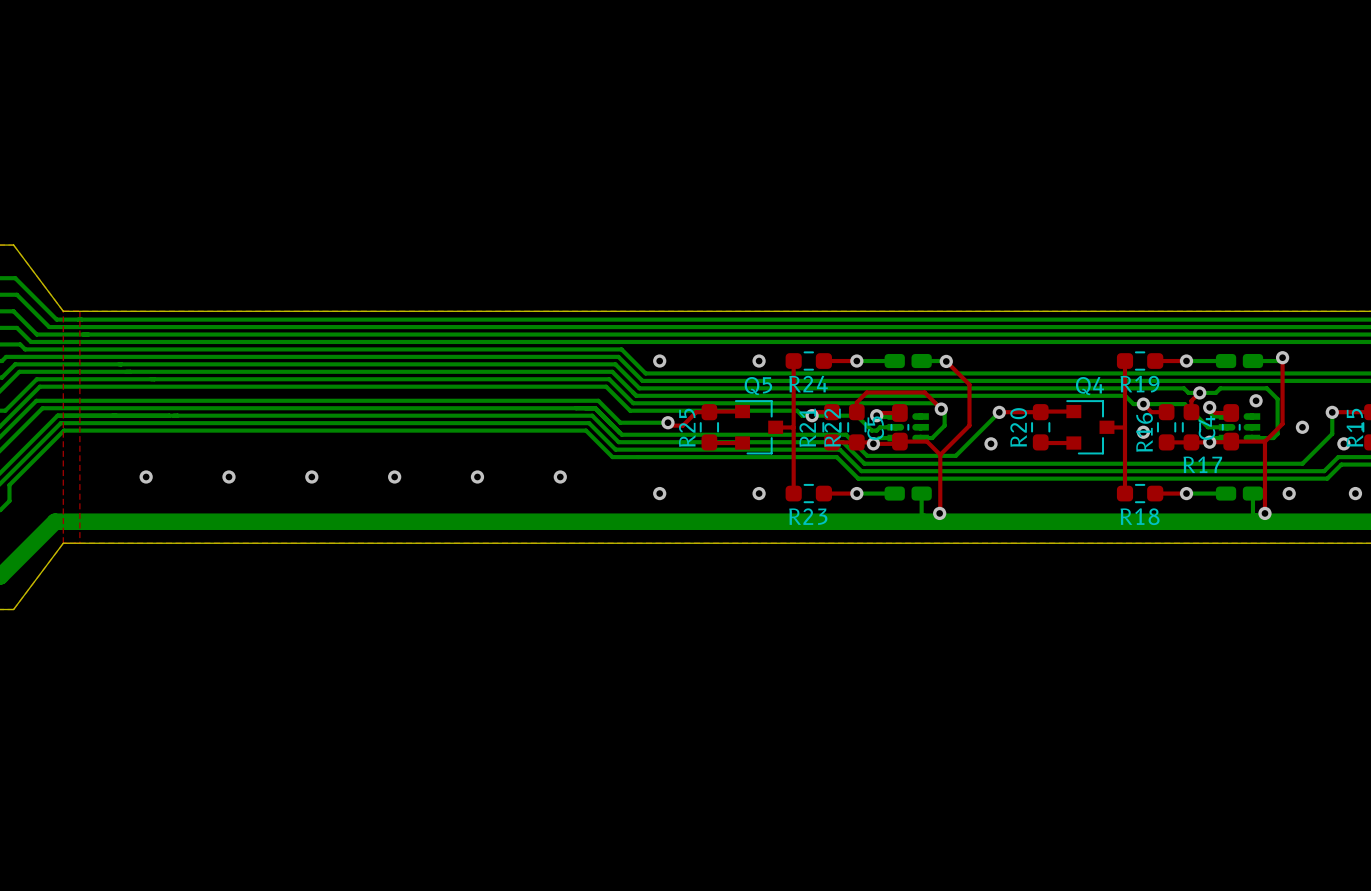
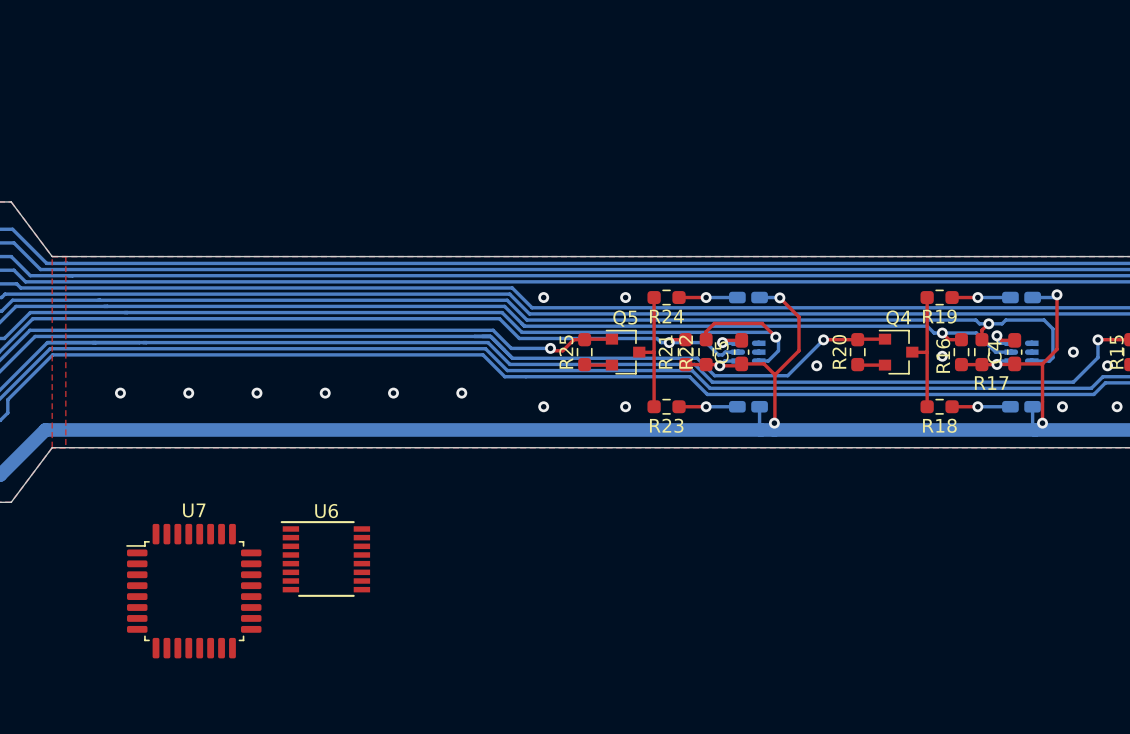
via: (1256, 400) -> none
U6: none -> (325, 558)
U7: none -> (193, 591)

